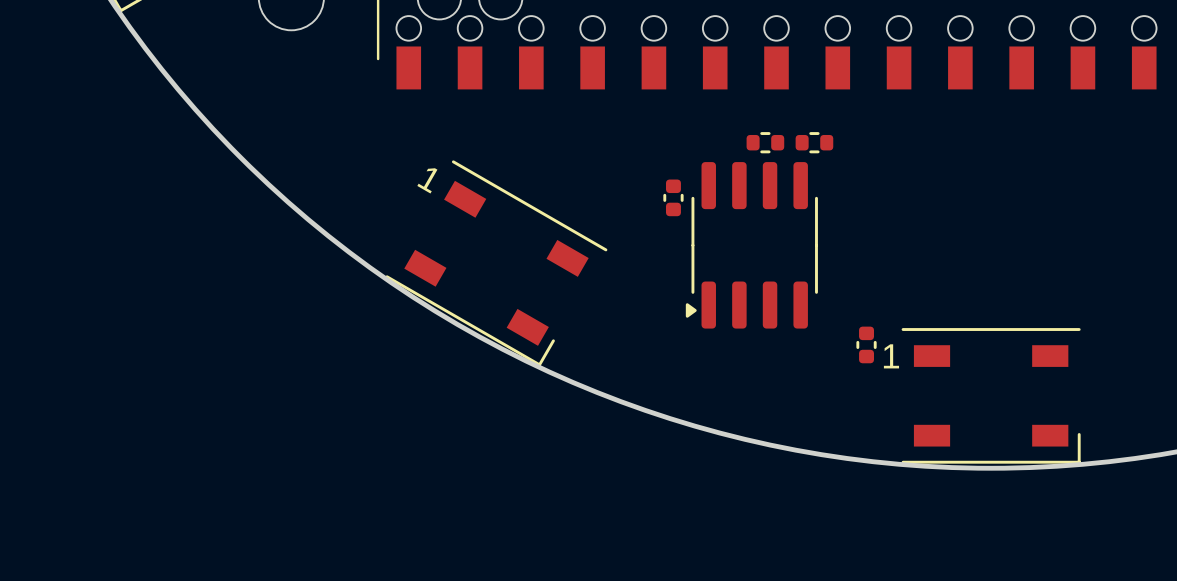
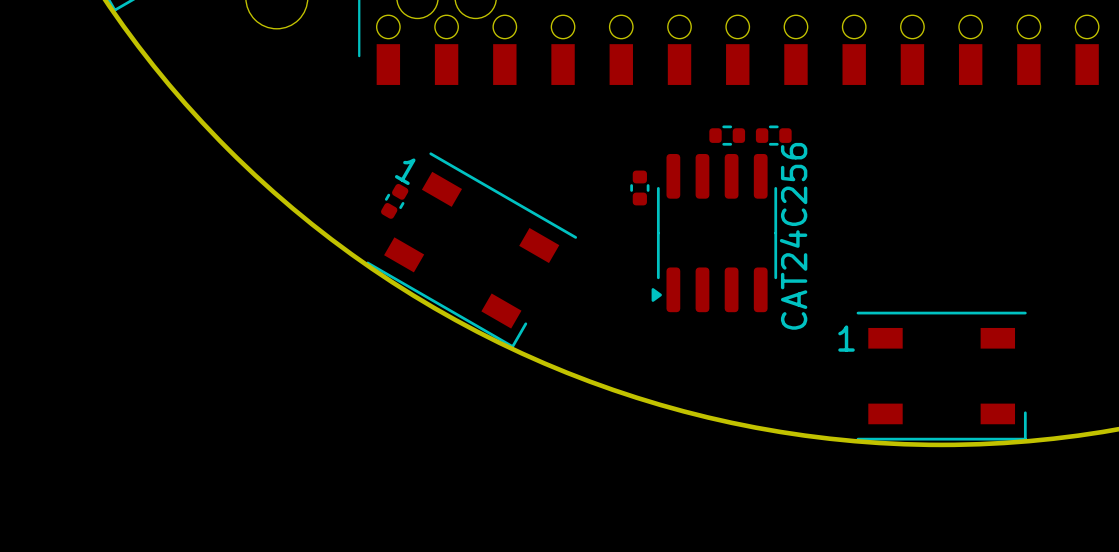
part: none -> (394, 201)
part value: none -> CAT24C256 (793, 236)
part: (866, 344) -> none

